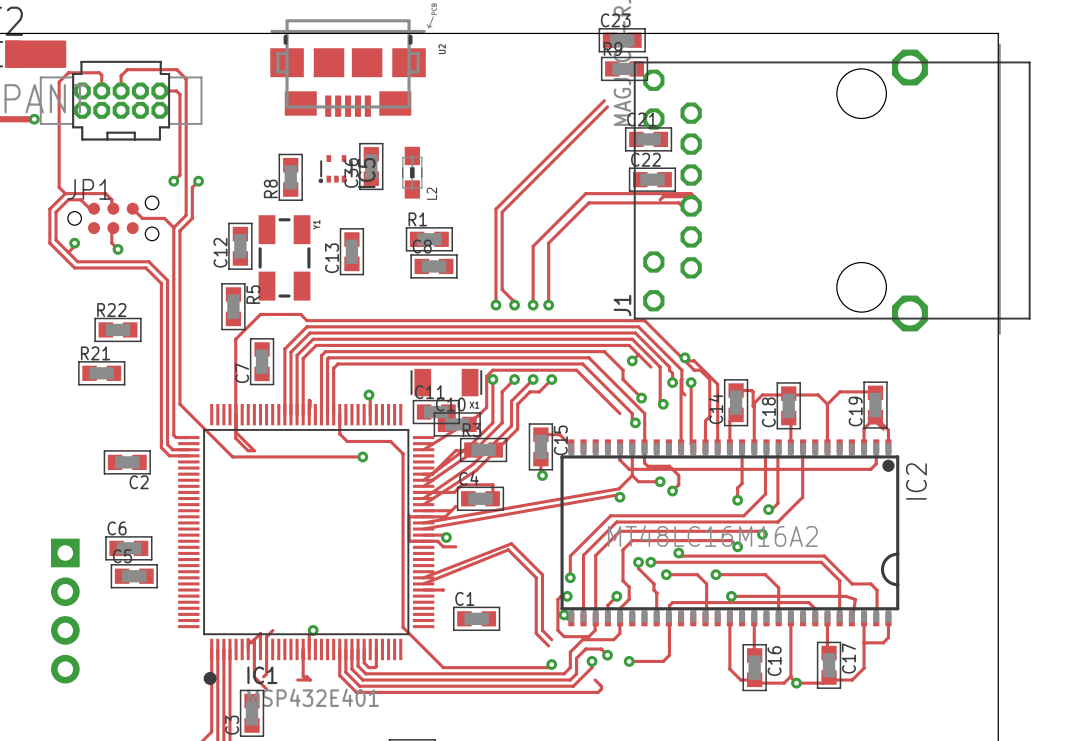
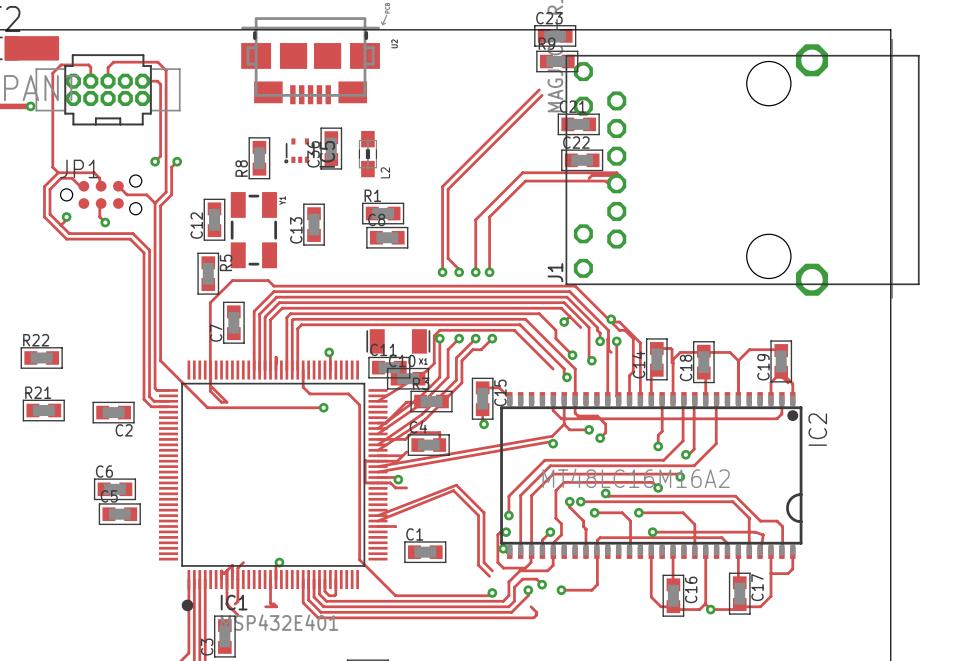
R22 position: (118, 329) -> (41, 357)
R21 position: (101, 373) -> (43, 410)
part: (65, 611) -> none

